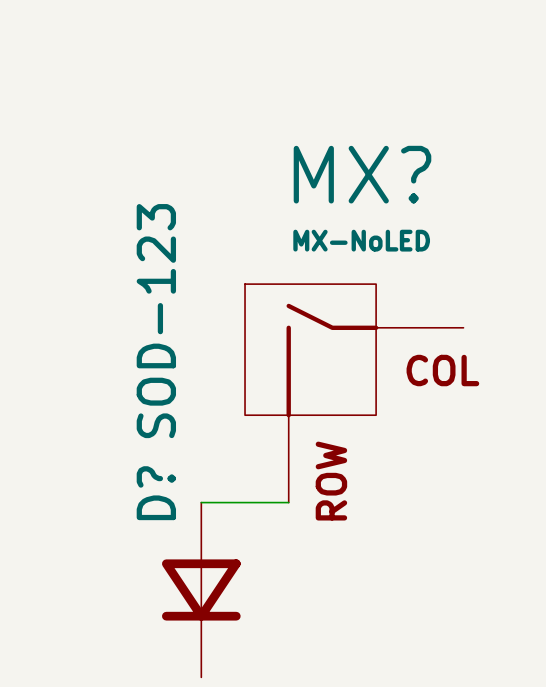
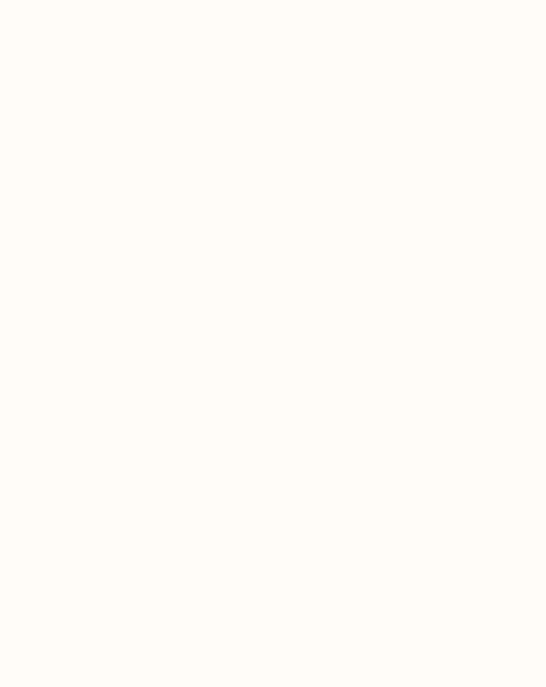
MX?: MX-NoLED (354, 393) -> none
wire: (201, 502) (288, 502) -> none
D?: SOD-123 (201, 589) -> none

